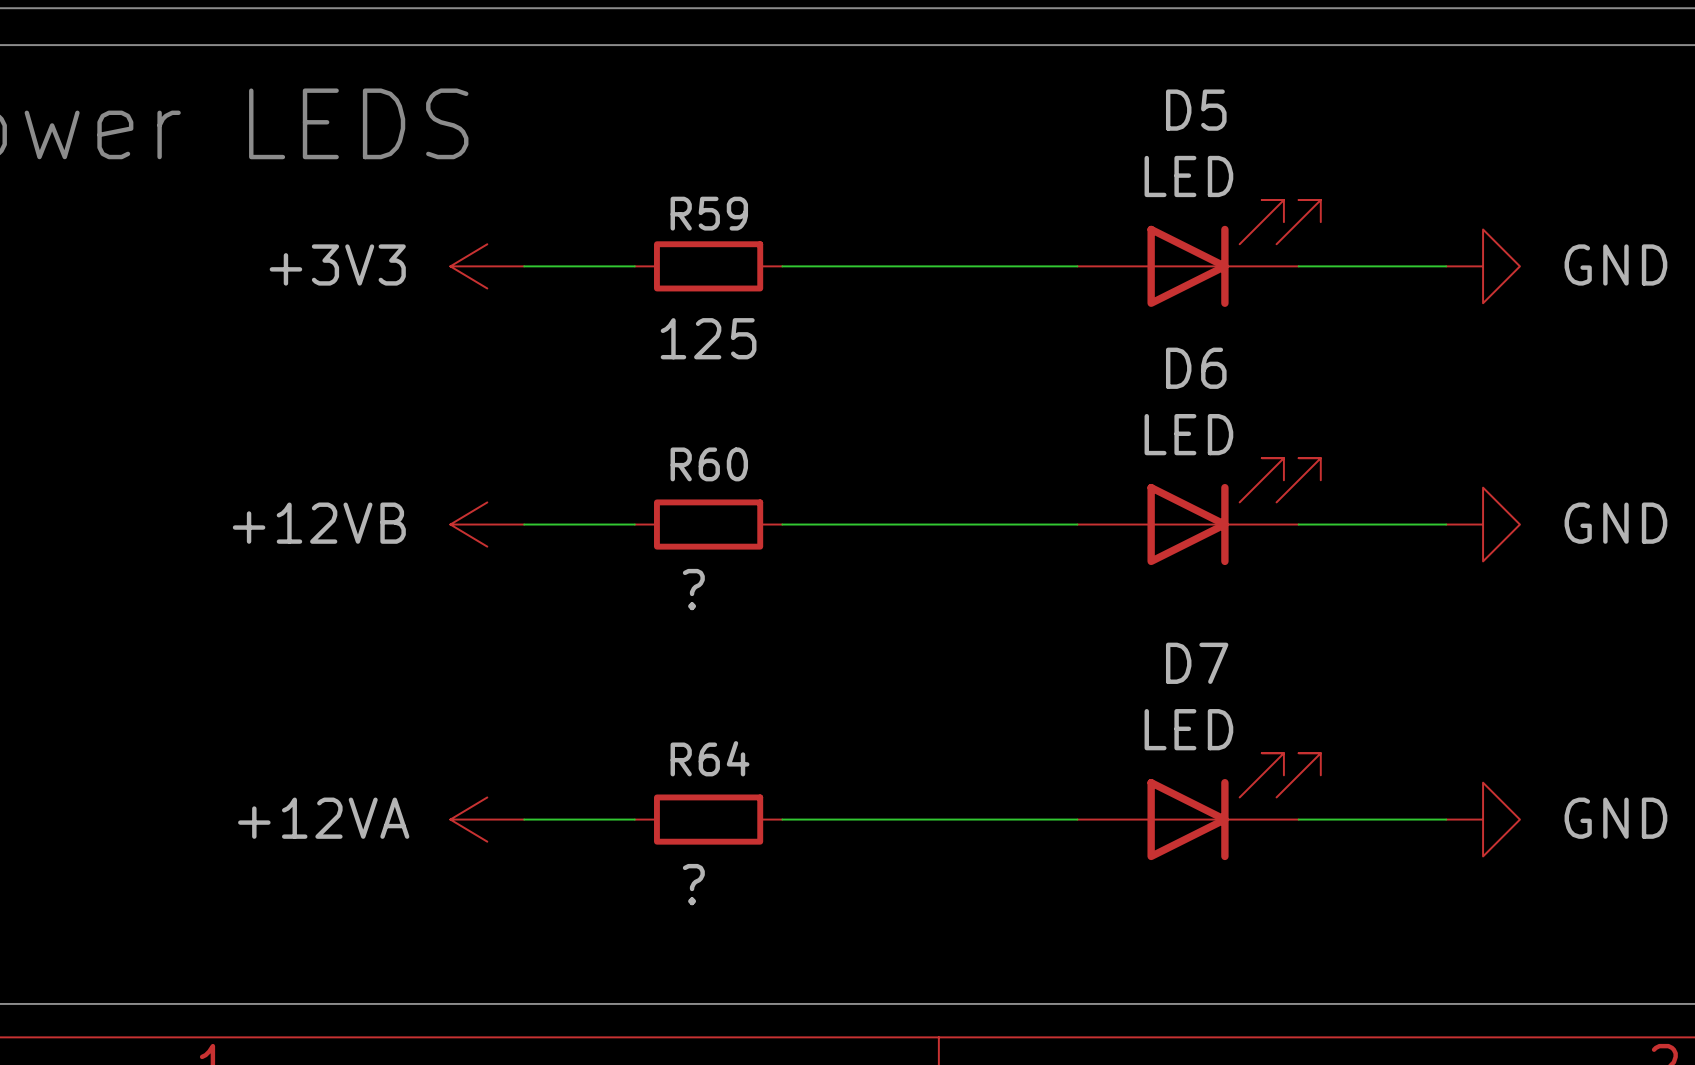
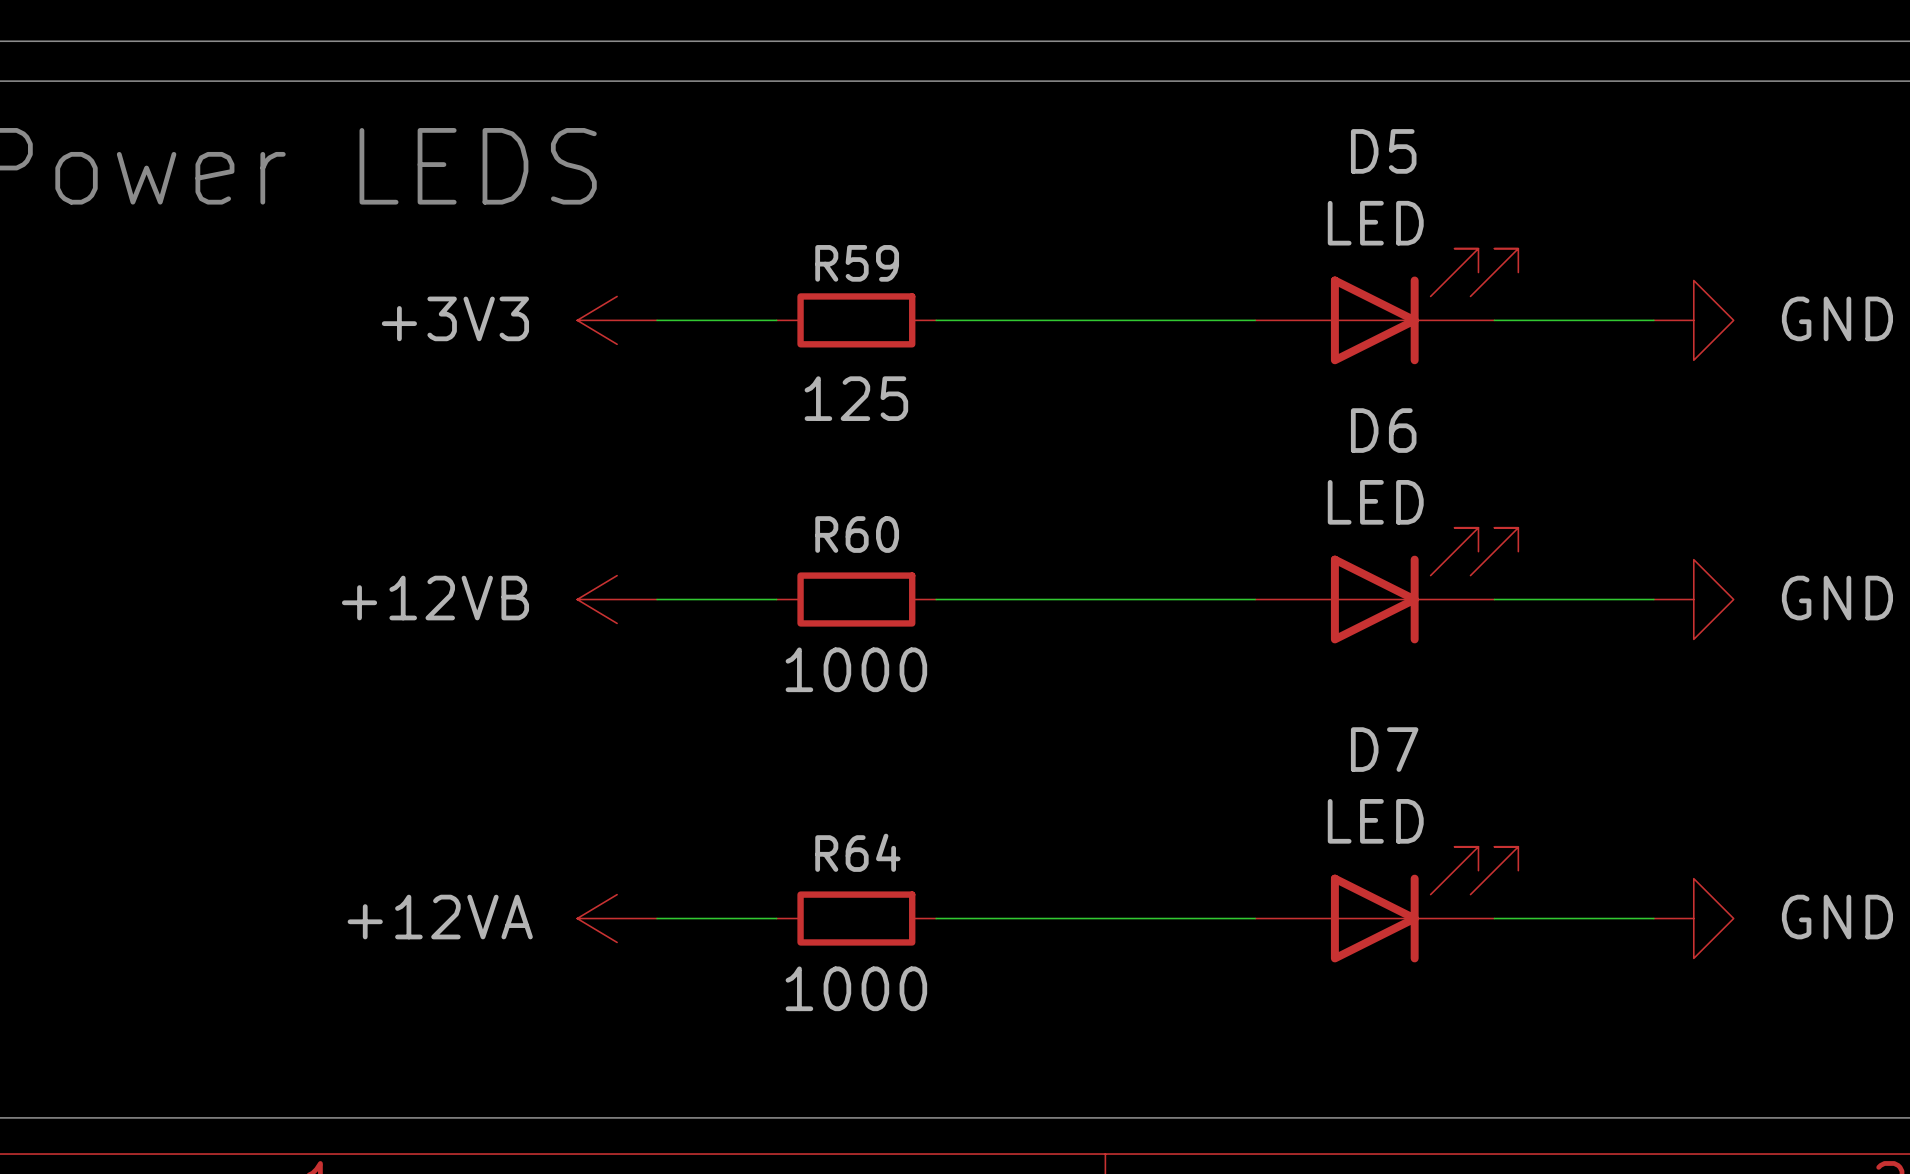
R60 value: ? (693, 589) -> 1000 (856, 669)
R64 value: ? (693, 884) -> 1000 (856, 988)

